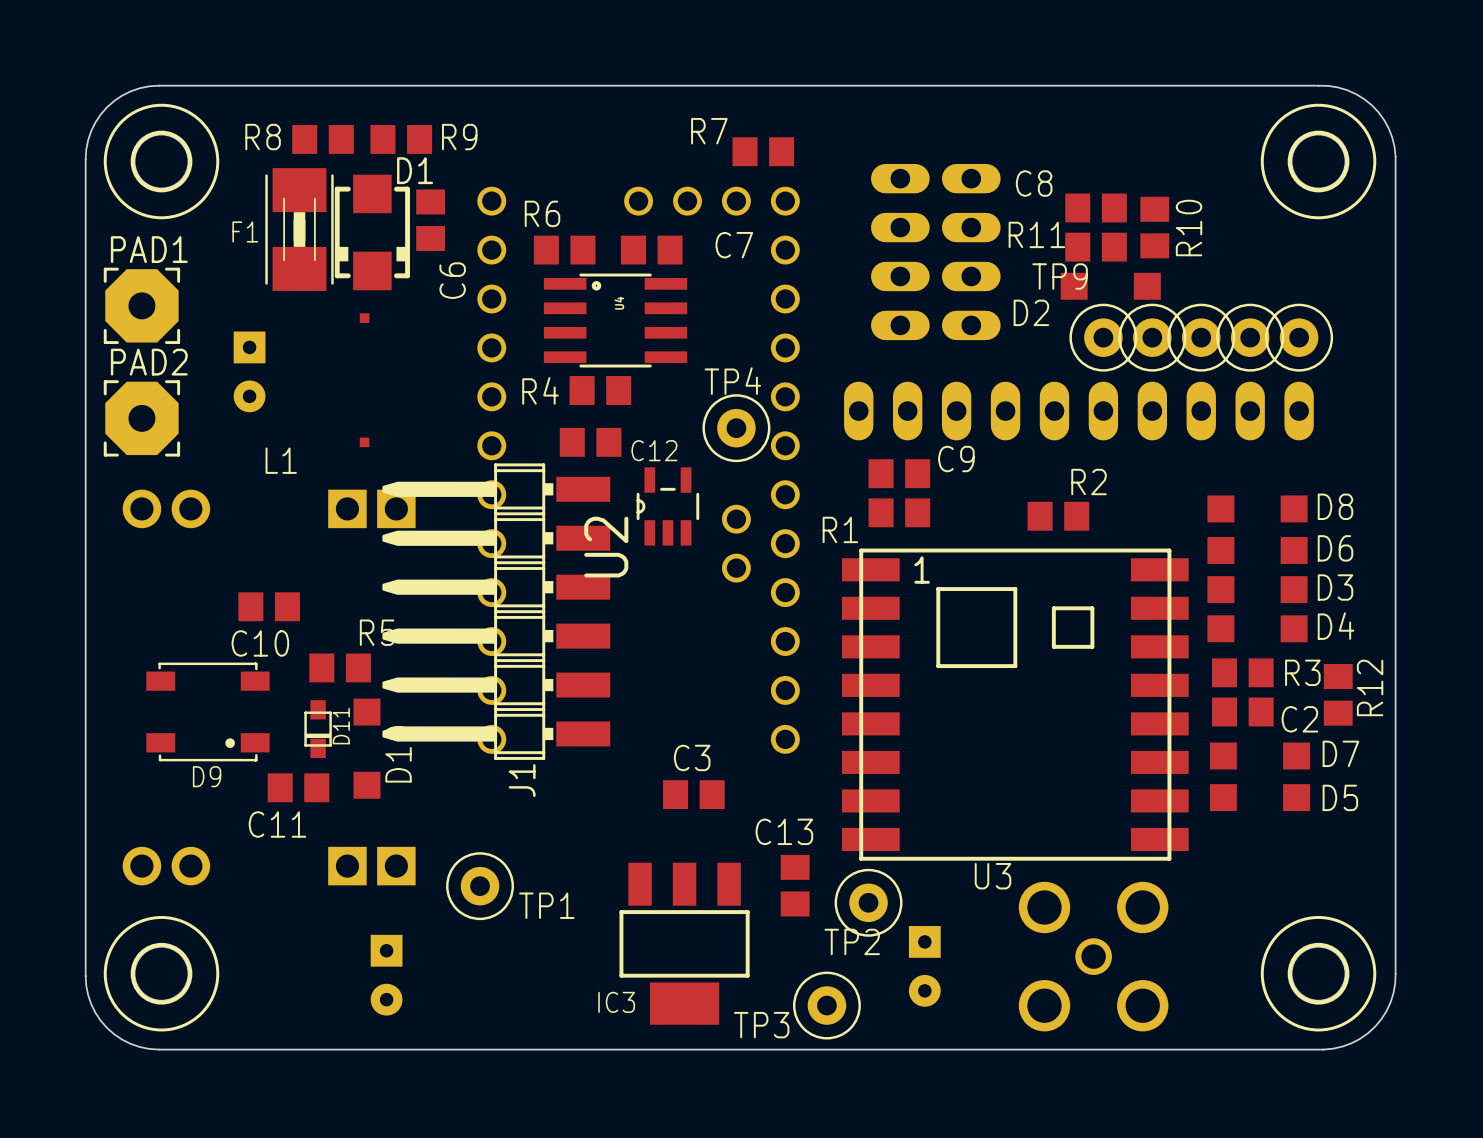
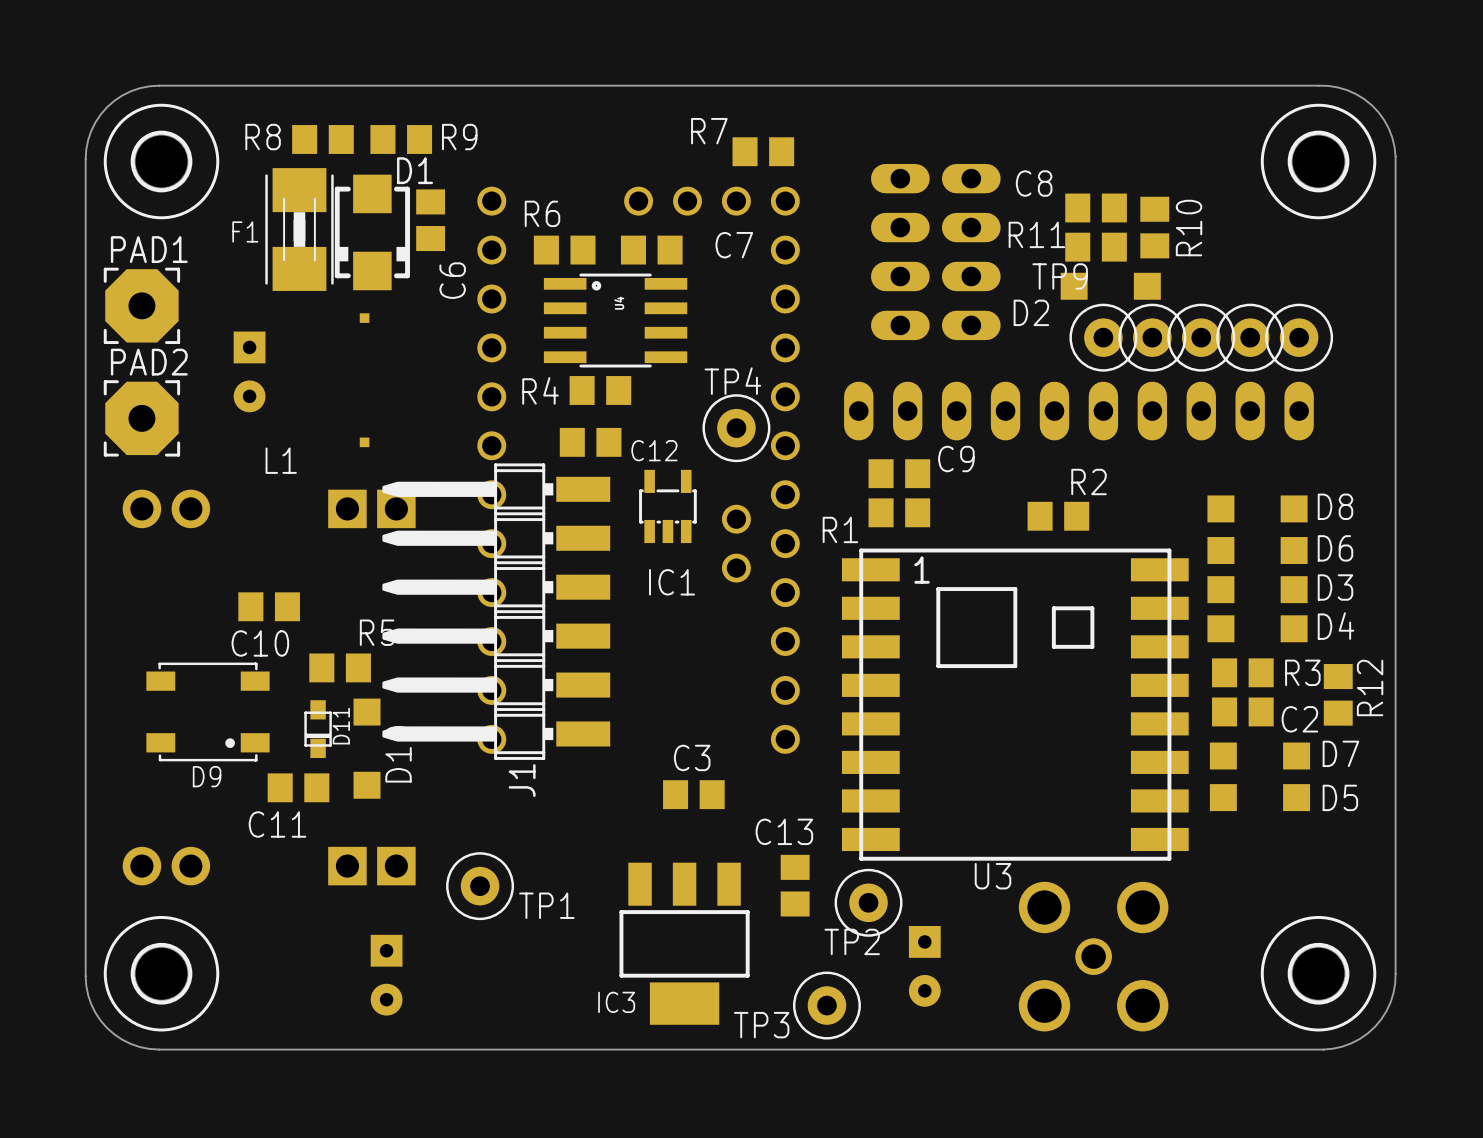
U2: (667, 506) -> none
IC1: none -> (667, 506)

